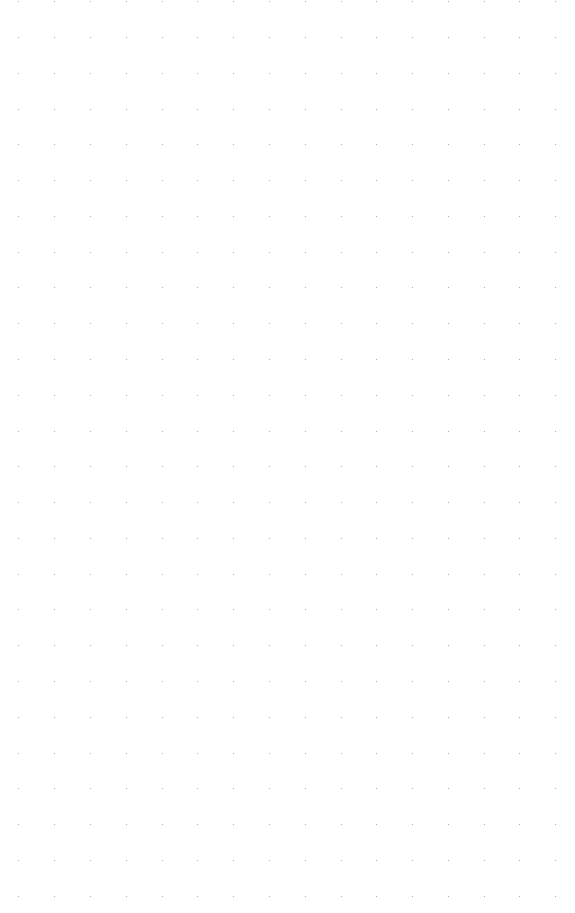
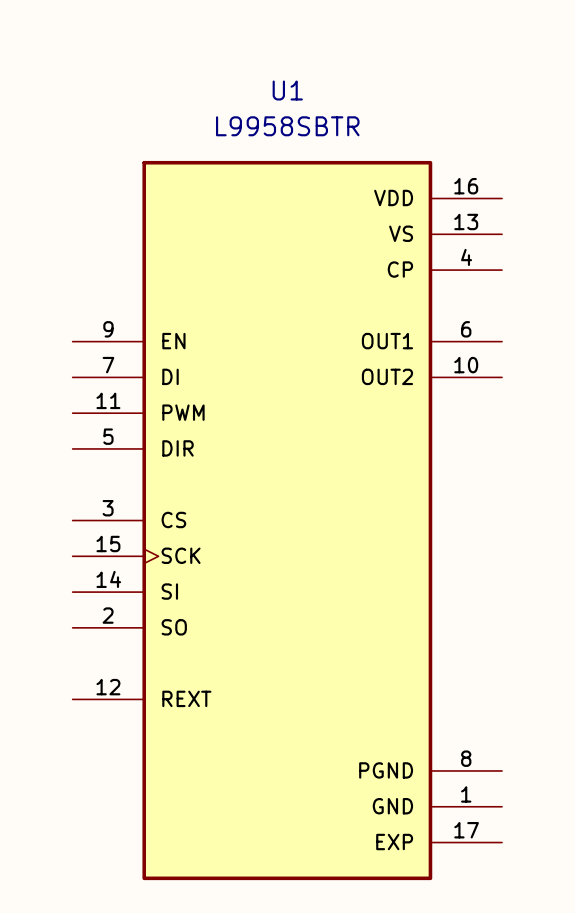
U1: none -> L9958SBTR (287, 520)

